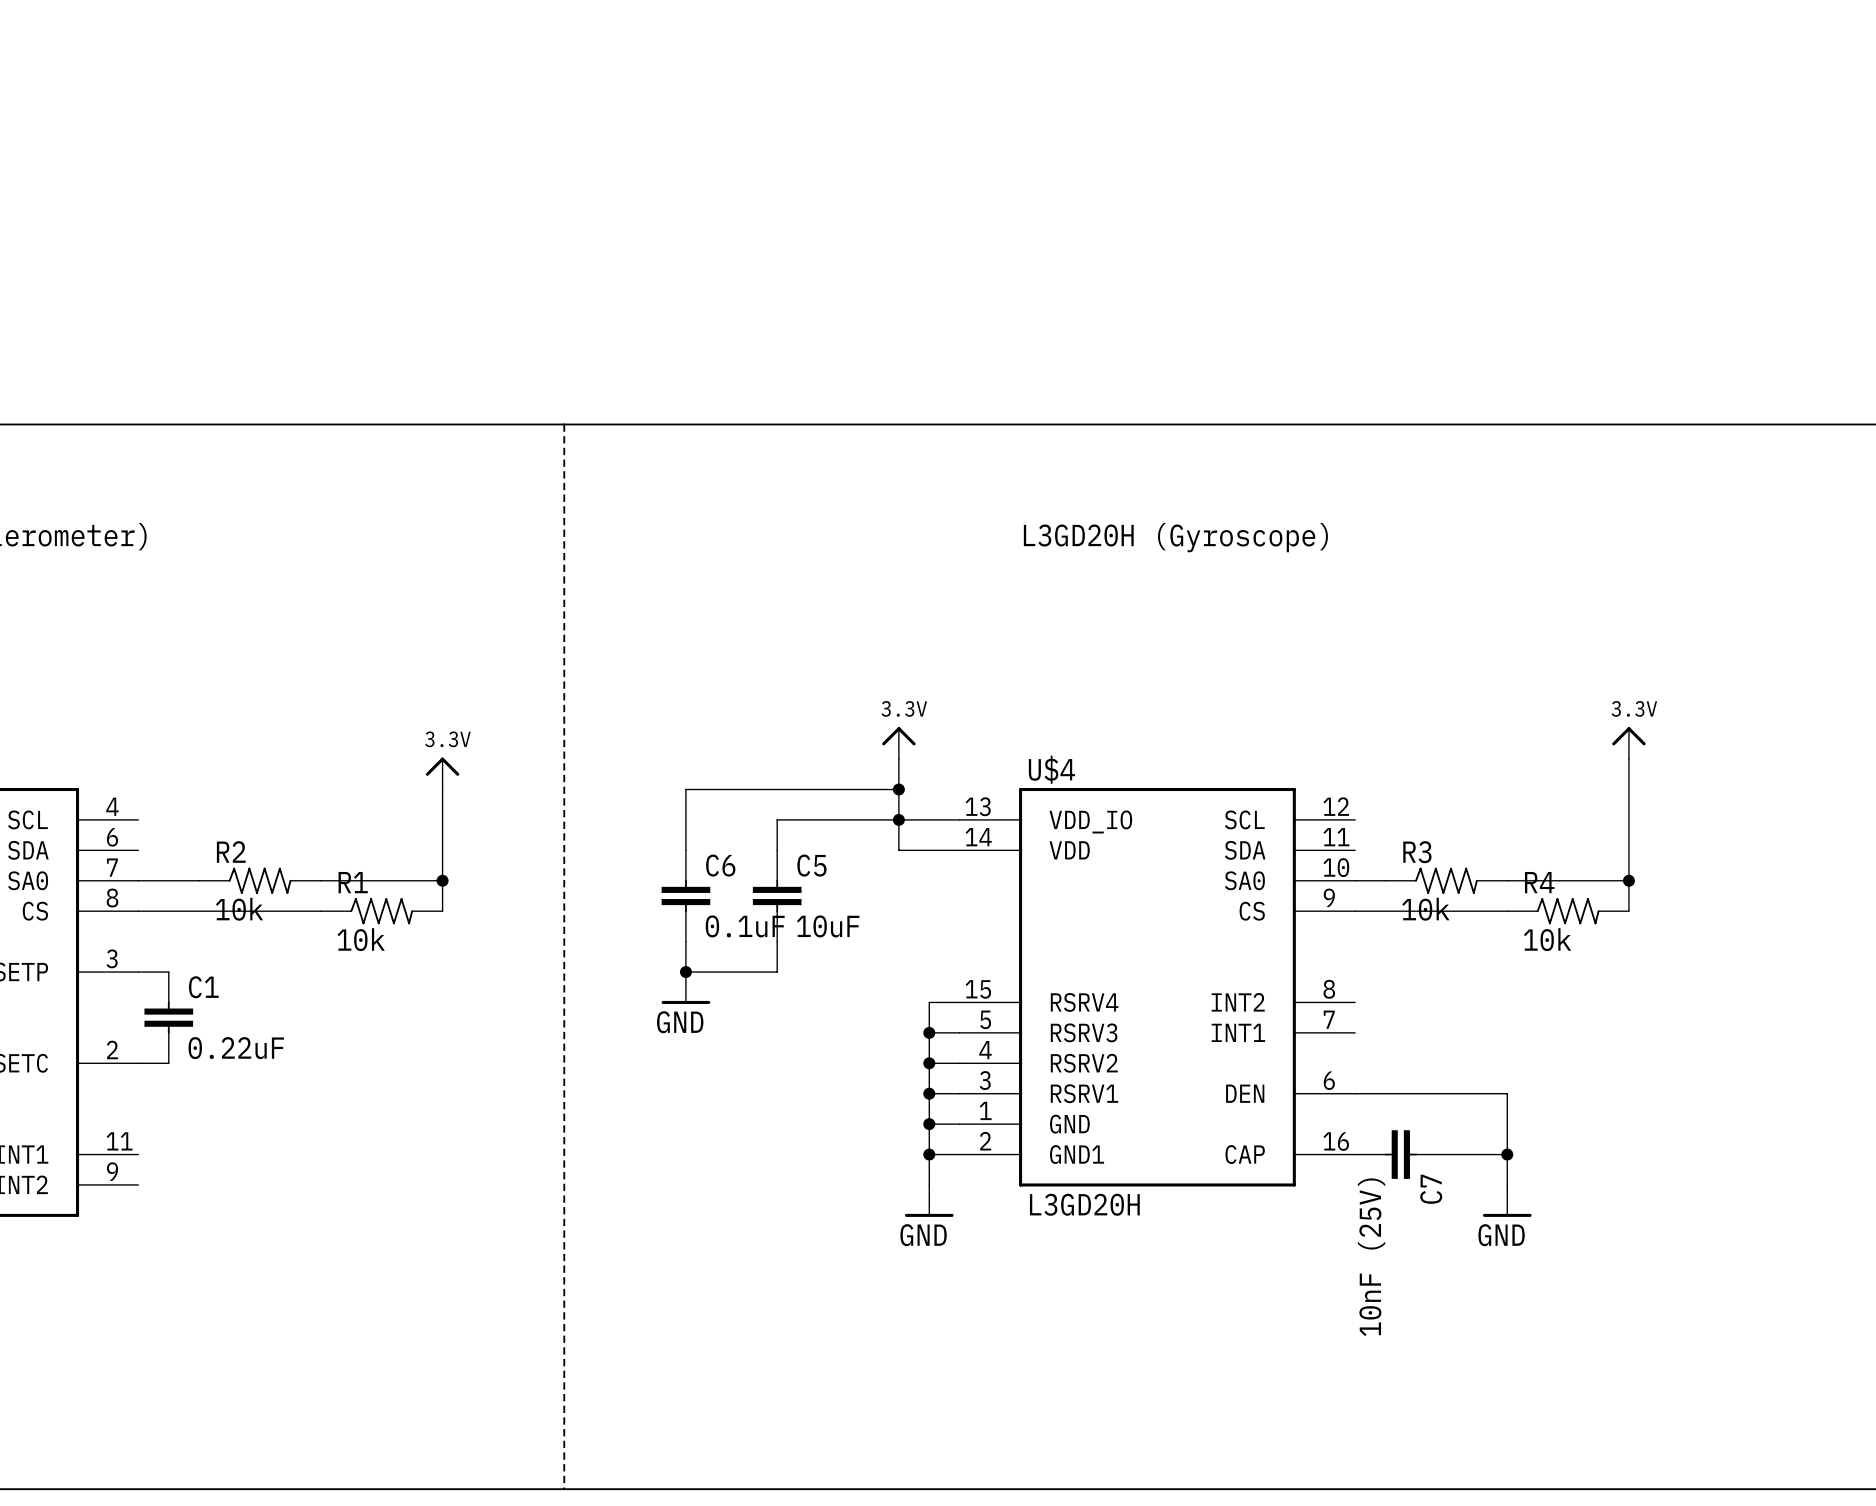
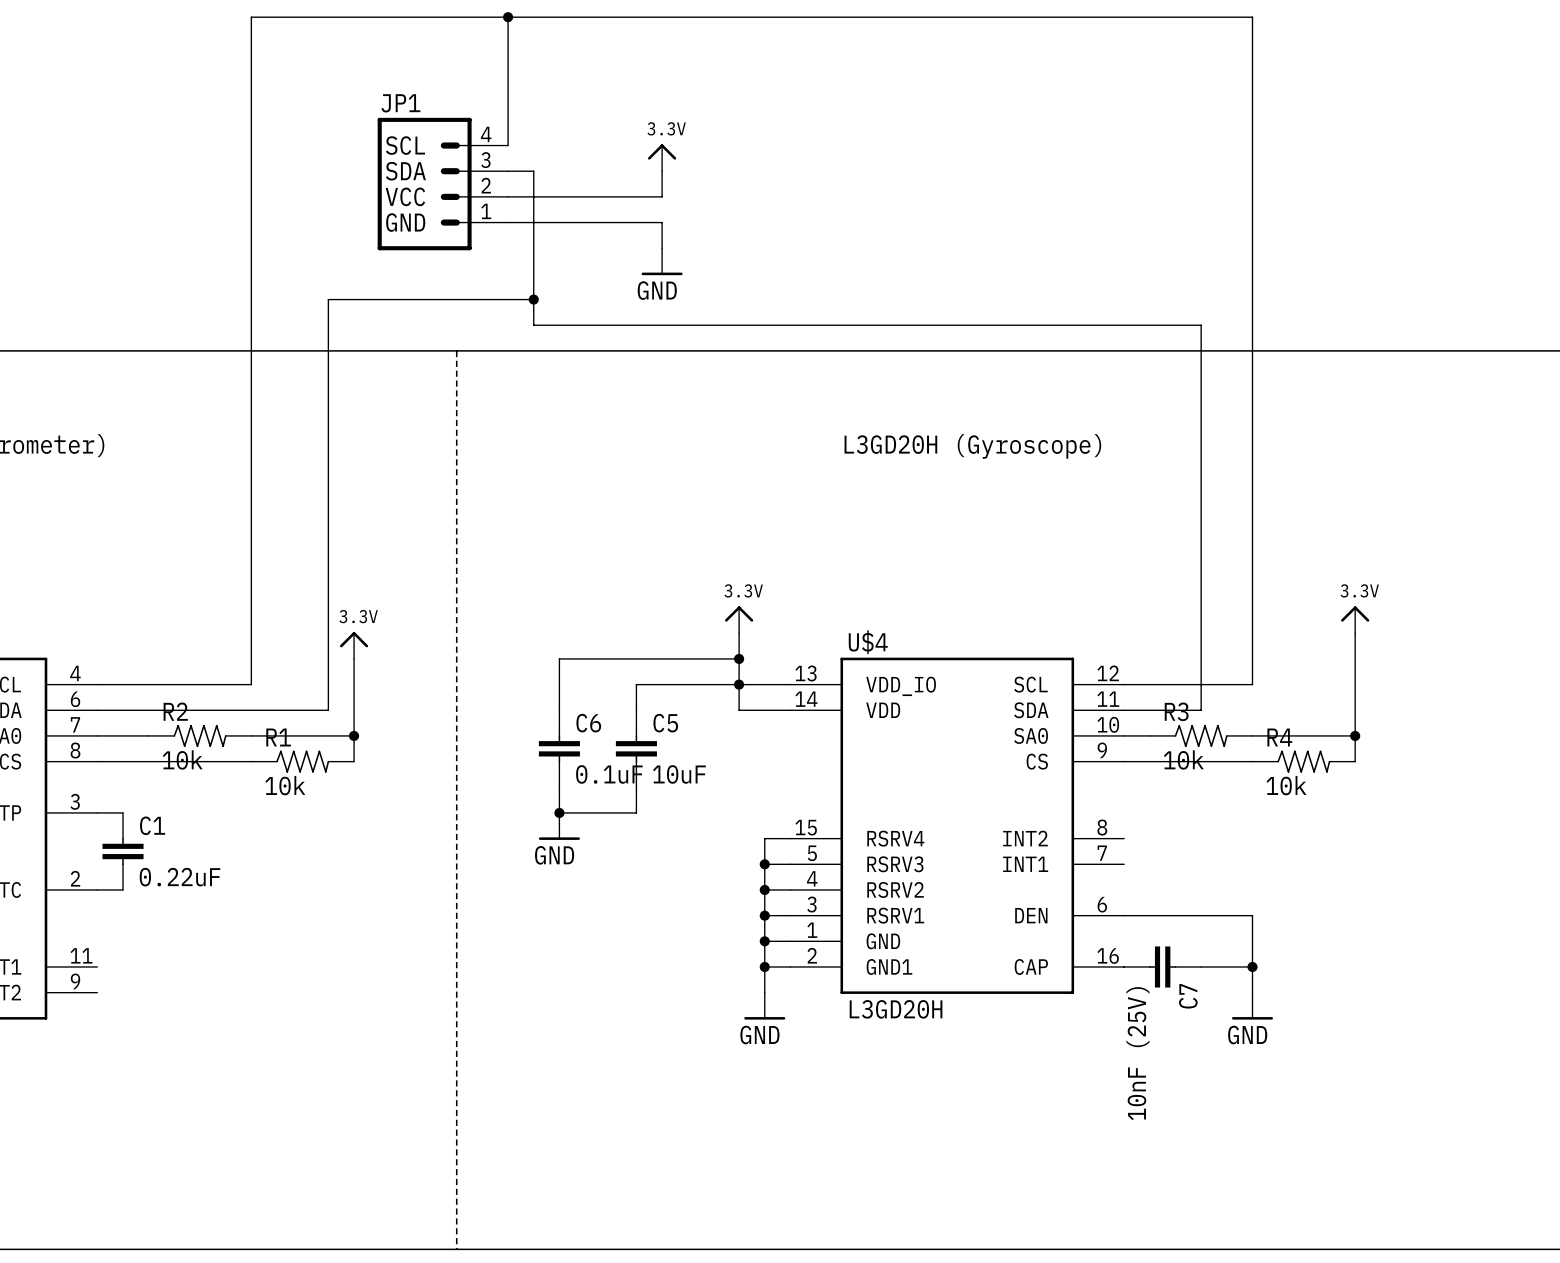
wire: none -> (508, 17) (508, 145)
junction: none -> (508, 17)
power symbol: none -> 3.3V (662, 157)
wire: none -> (508, 171) (533, 171) (533, 325) (1201, 325) (1201, 710) (1124, 710)
wire: none -> (662, 171) (662, 196) (508, 196)
JP1: none -> (442, 184)
wire: none -> (508, 222) (662, 222) (662, 248)
power symbol: none -> GND (662, 261)
wire: none -> (533, 299) (328, 299) (328, 710) (97, 710)
junction: none -> (533, 299)
wire: none -> (97, 684) (251, 684) (251, 17) (1252, 17) (1252, 684) (1124, 684)

